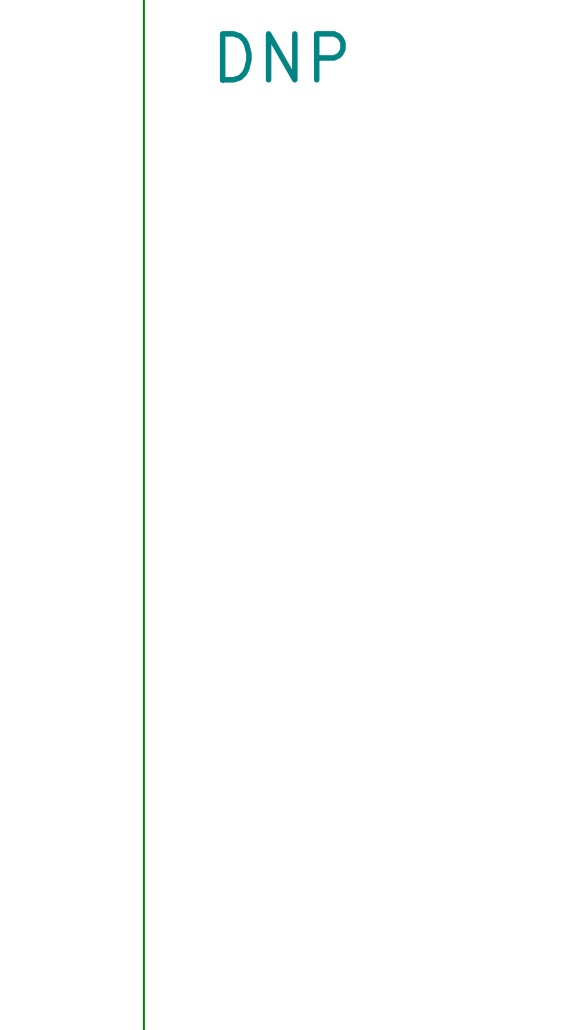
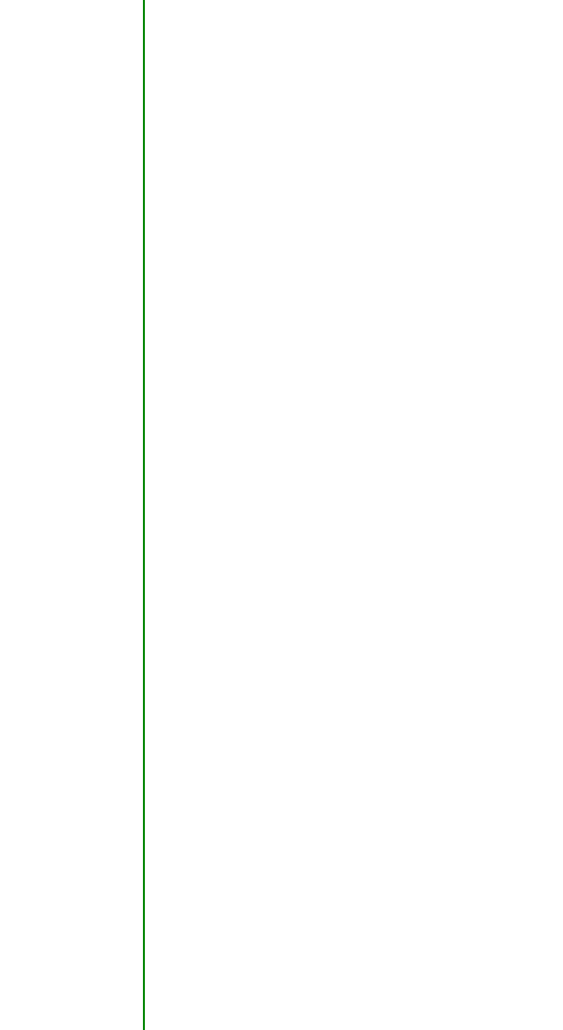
part text: DNP (282, 56) -> none

